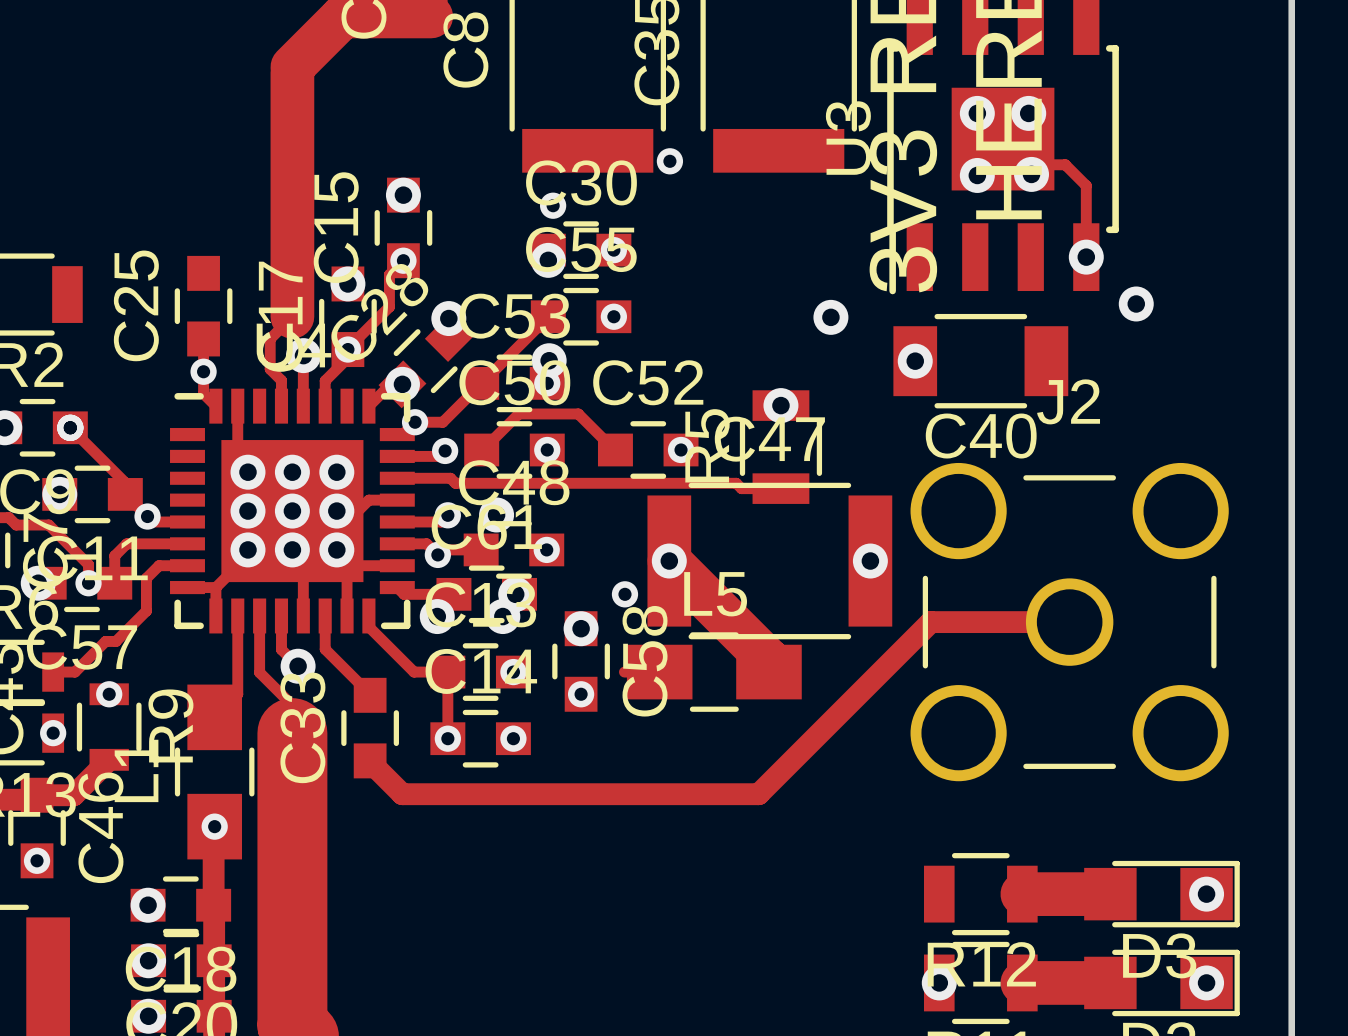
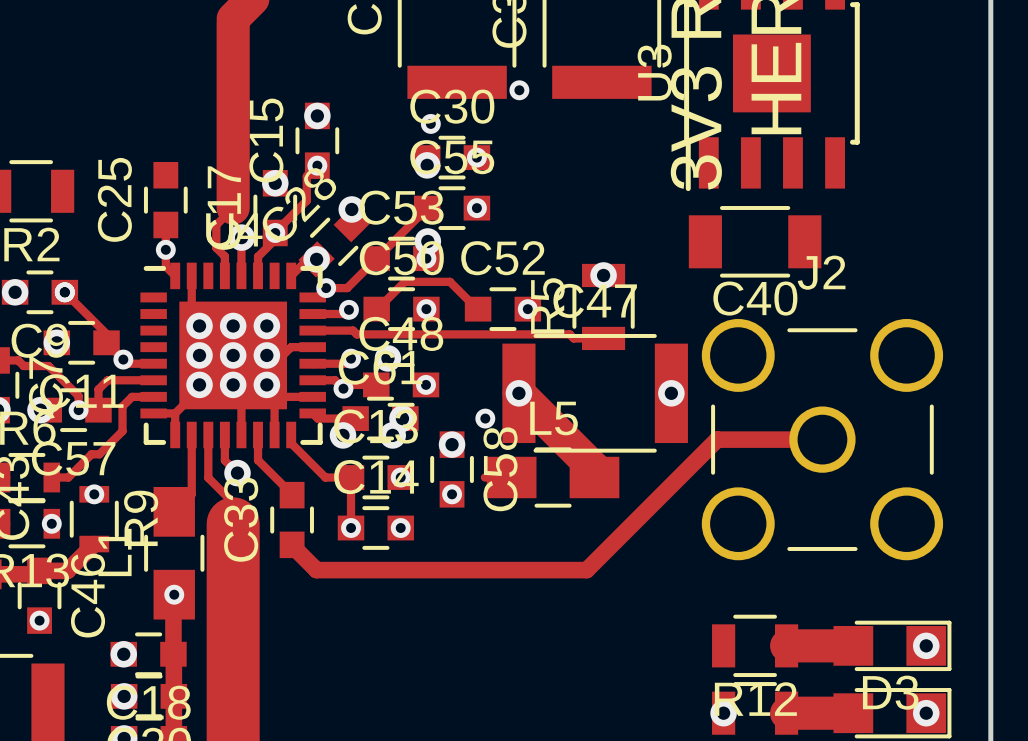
via: (977, 113) -> none
via: (1028, 113) -> none
track: (1031, 174) (1028, 171) (1028, 164) (1065, 164) (1086, 185) (1086, 257) -> none
via: (1031, 174) -> none
via: (977, 175) -> none
via: (1086, 257) -> none
via: (1136, 303) -> none
via: (830, 317) -> none
via: (915, 361) -> none

